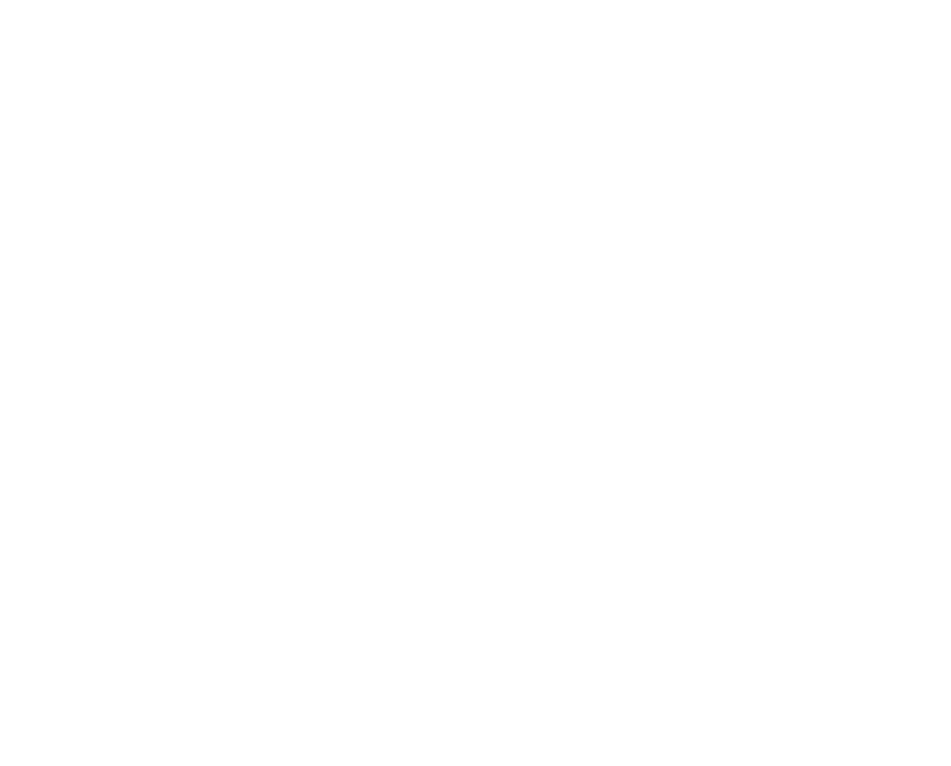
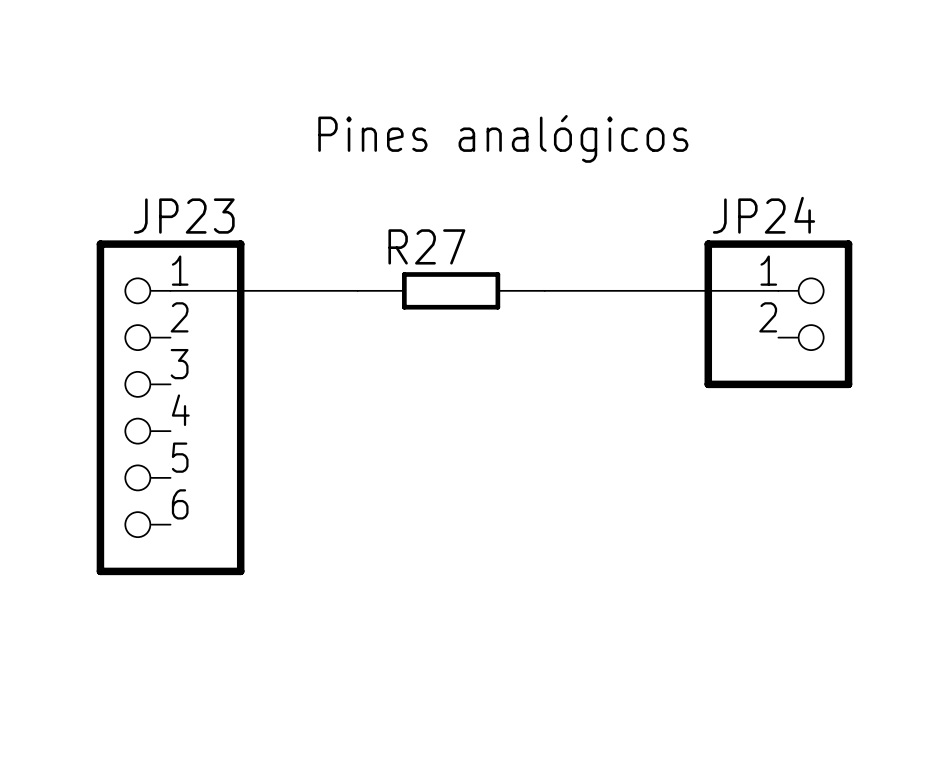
text: none -> Pines analógicos (503, 138)
wire: none -> (170, 290) (357, 290)
R27: none -> (451, 290)
wire: none -> (544, 290) (778, 290)
JP24: none -> (778, 314)
JP23: none -> (170, 407)

